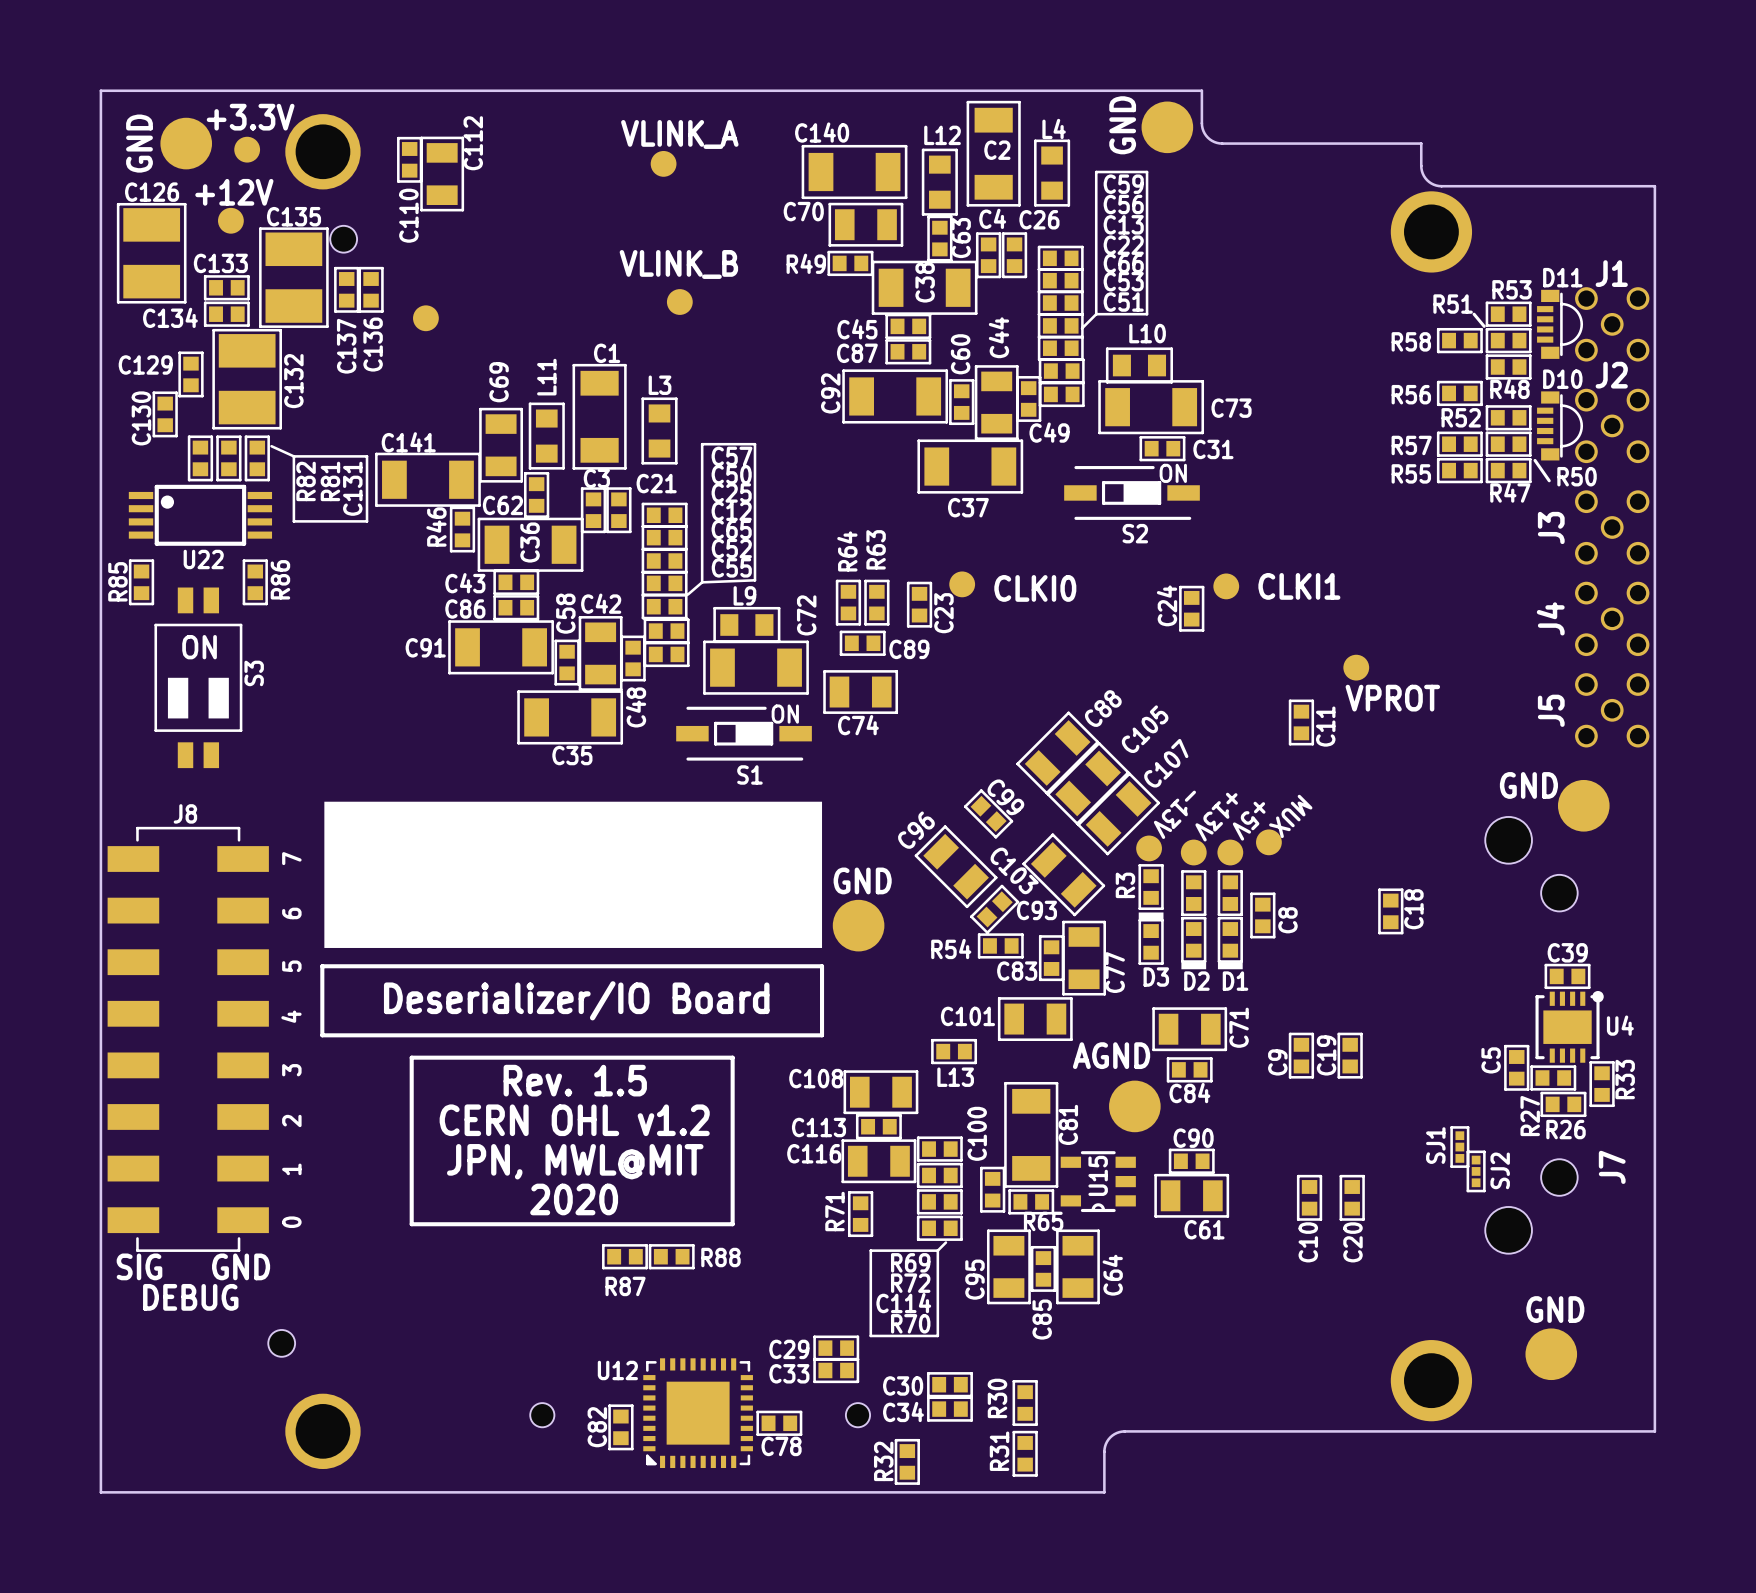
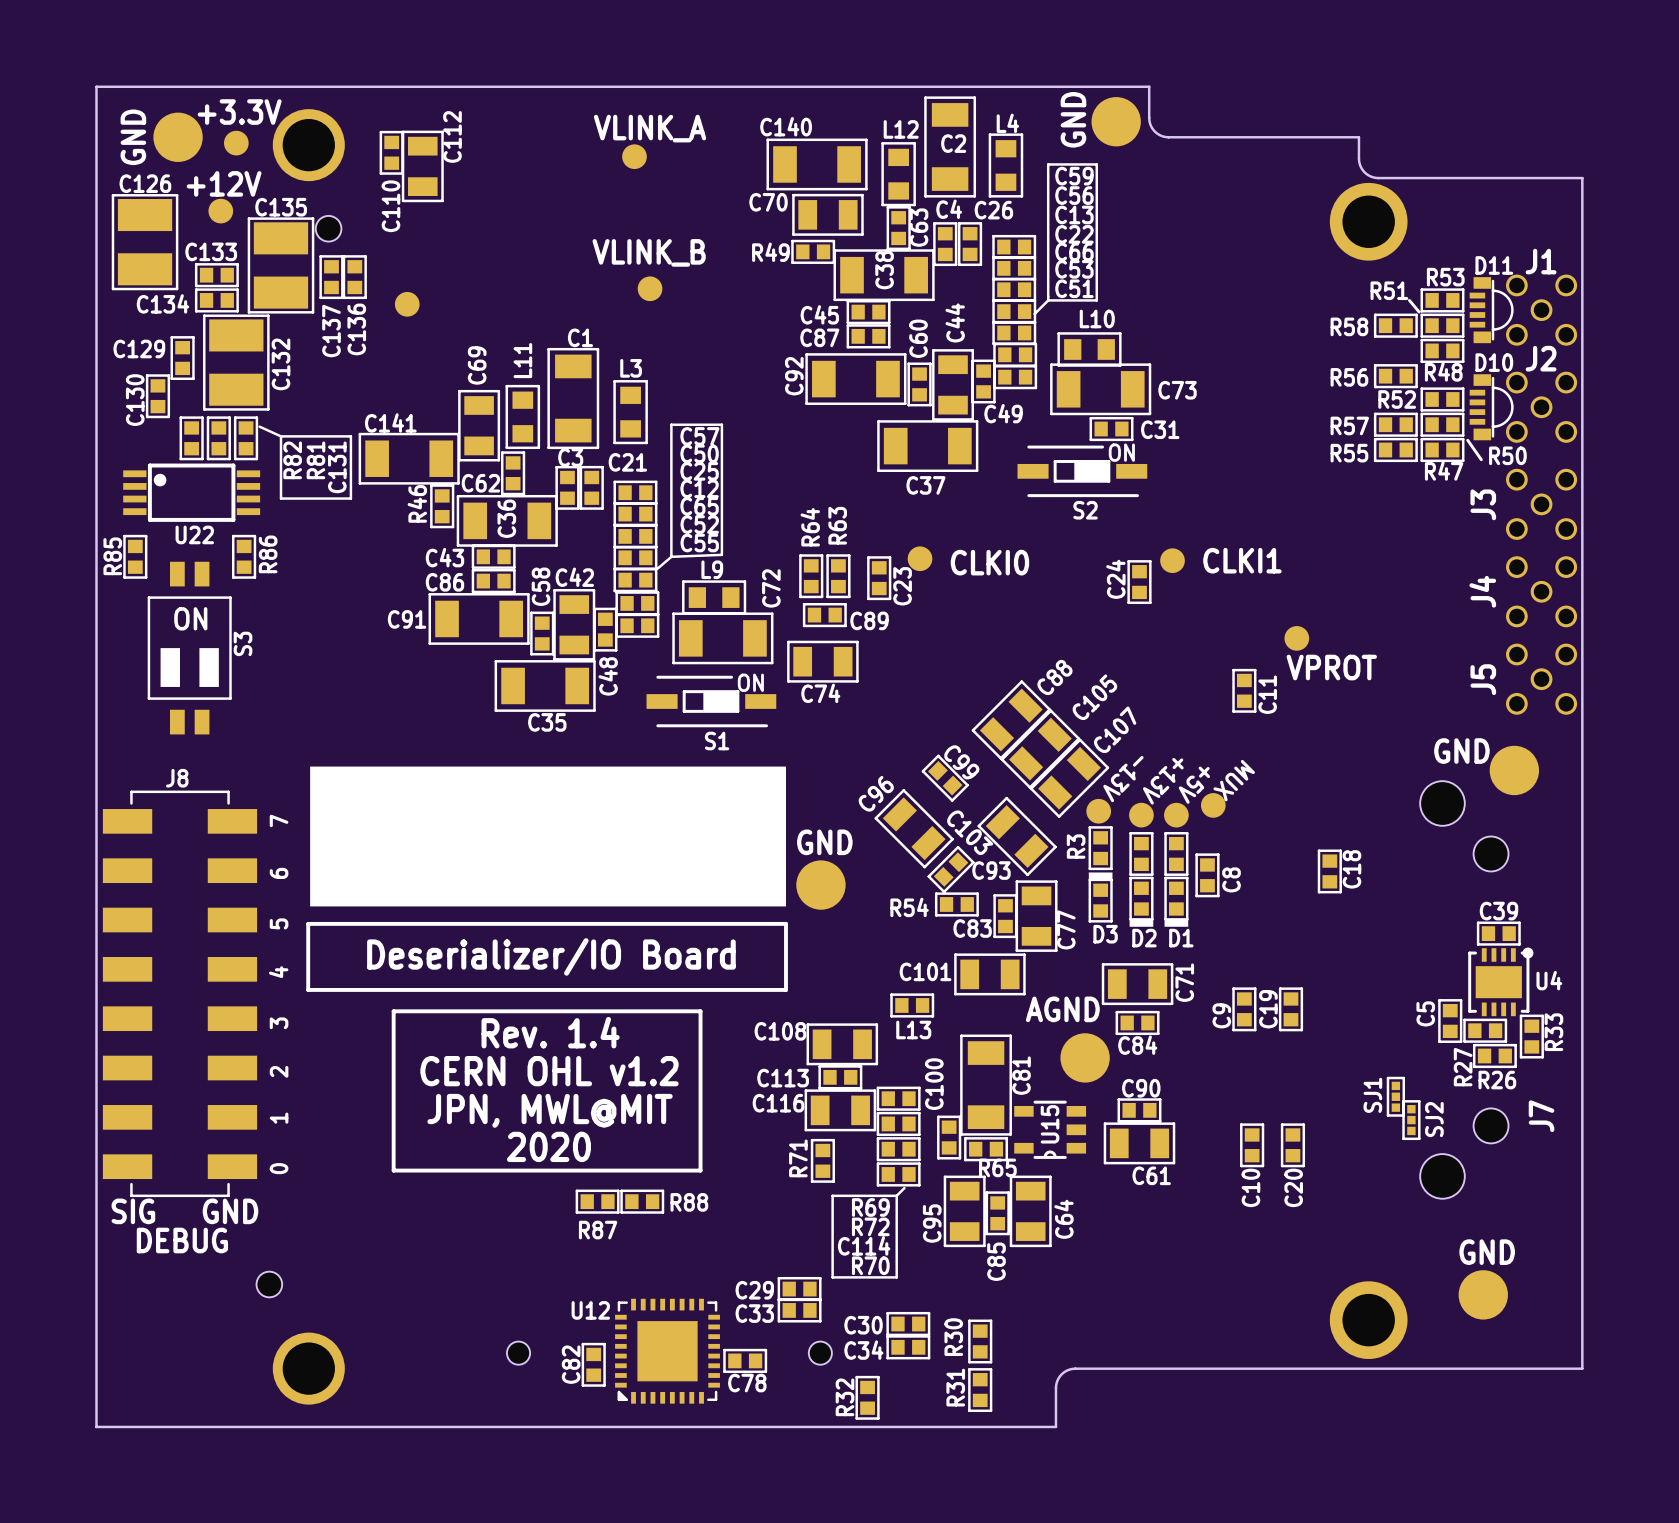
text: Rev. 1.5 (575, 1080) -> Rev. 1.4 (550, 1032)

